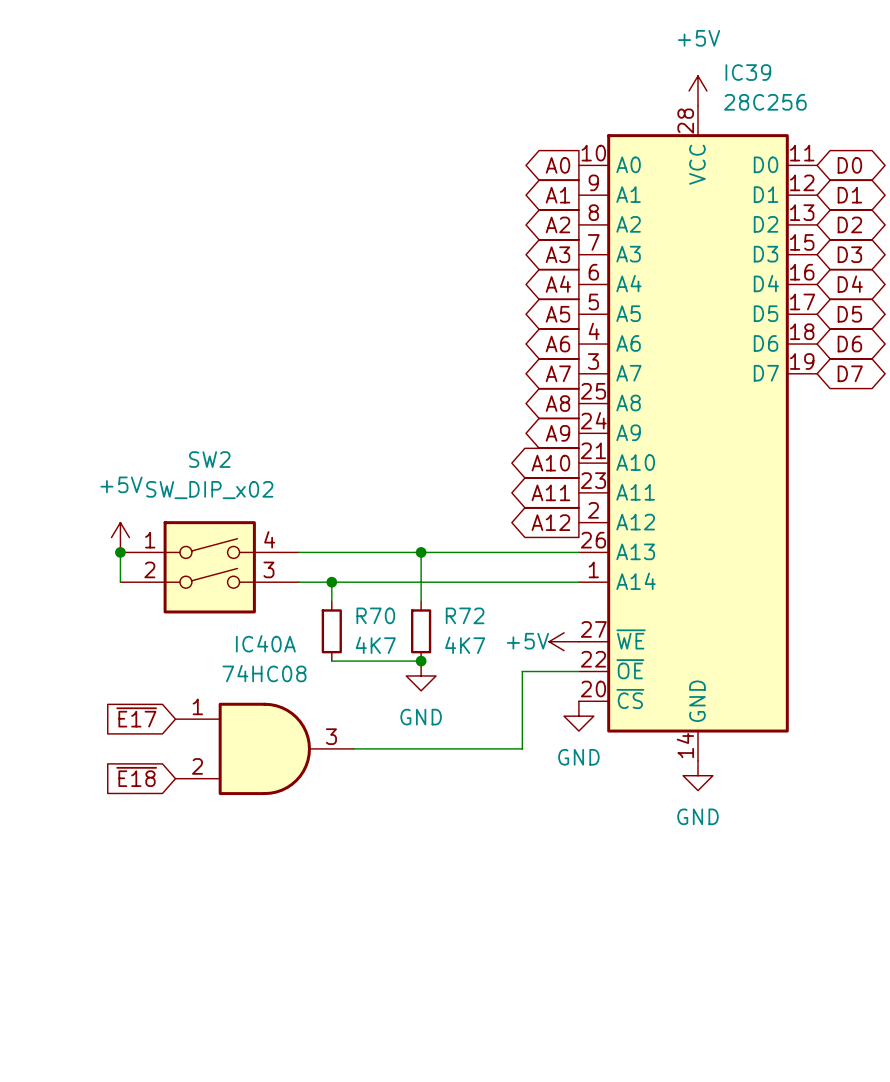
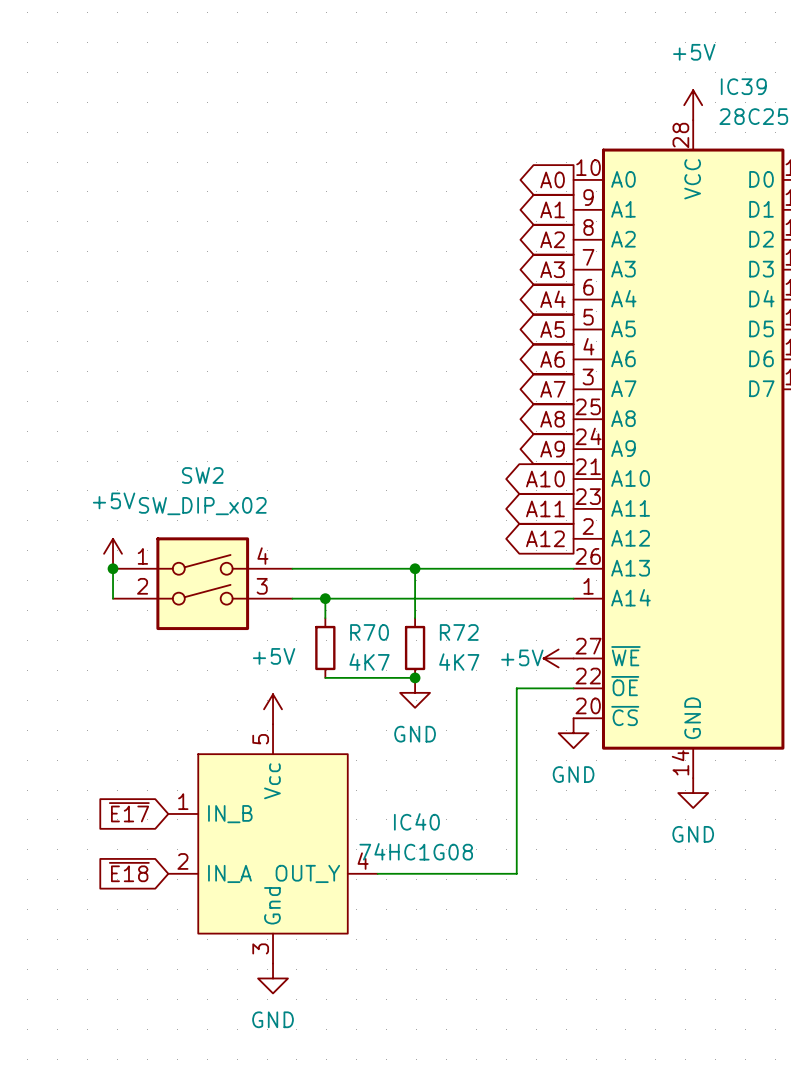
power symbol: none -> +5V (273, 709)
global label position: ~{E17} (136, 717) -> ~{E17} (129, 812)
IC40A: 74HC08 (264, 748) -> none
wire: (354, 748) (522, 748) -> (377, 873) (516, 873) (516, 766)
global label position: ~{E18} (136, 776) -> ~{E18} (129, 872)
IC40: none -> 74HC1G08 (273, 843)
power symbol: none -> GND (273, 978)

